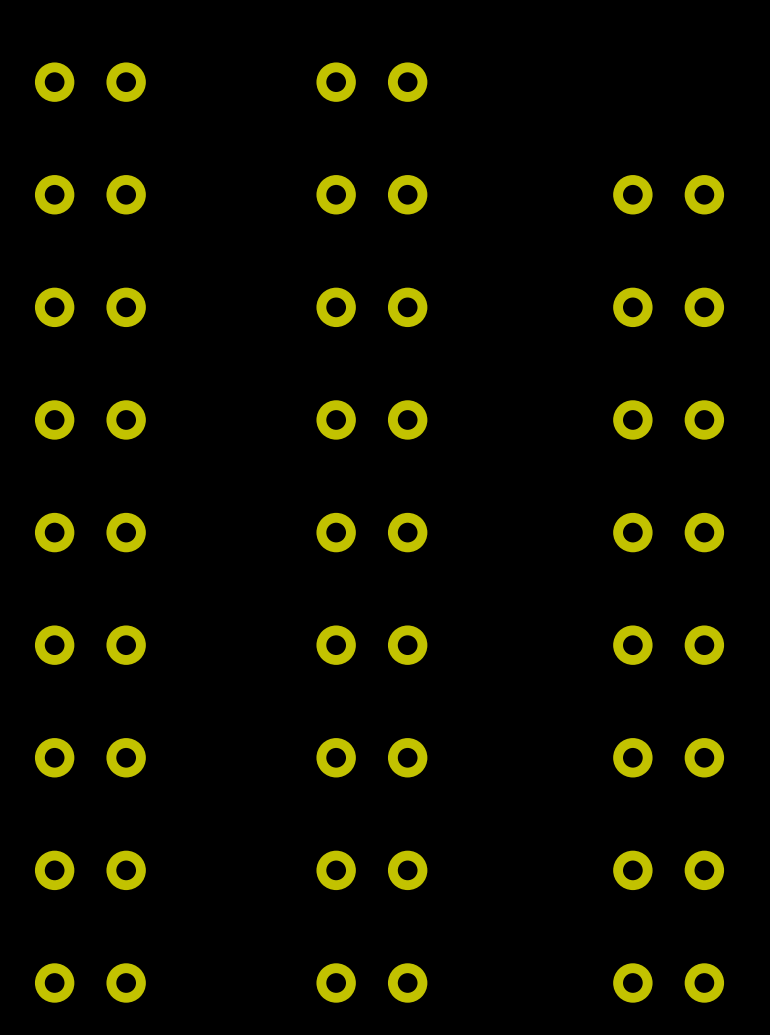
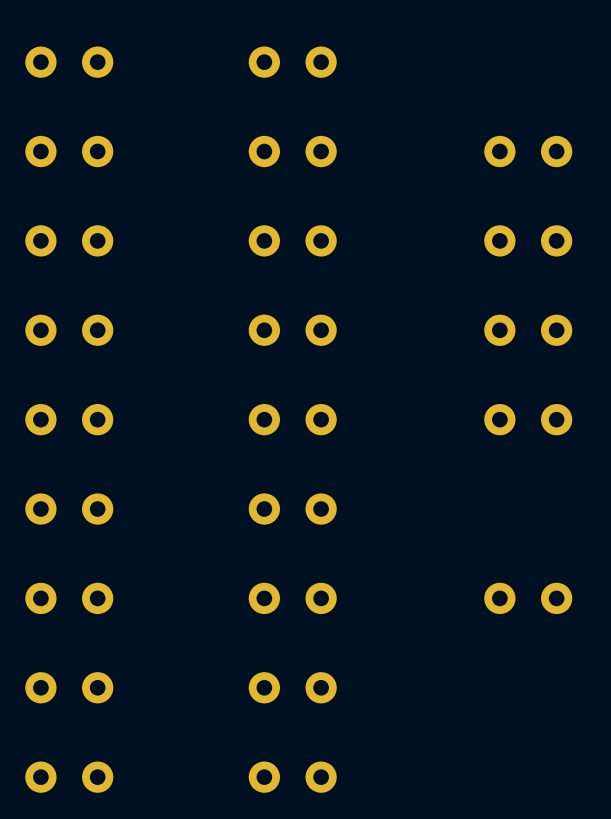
part: (668, 645) -> none
part: (668, 870) -> none
part: (668, 982) -> none

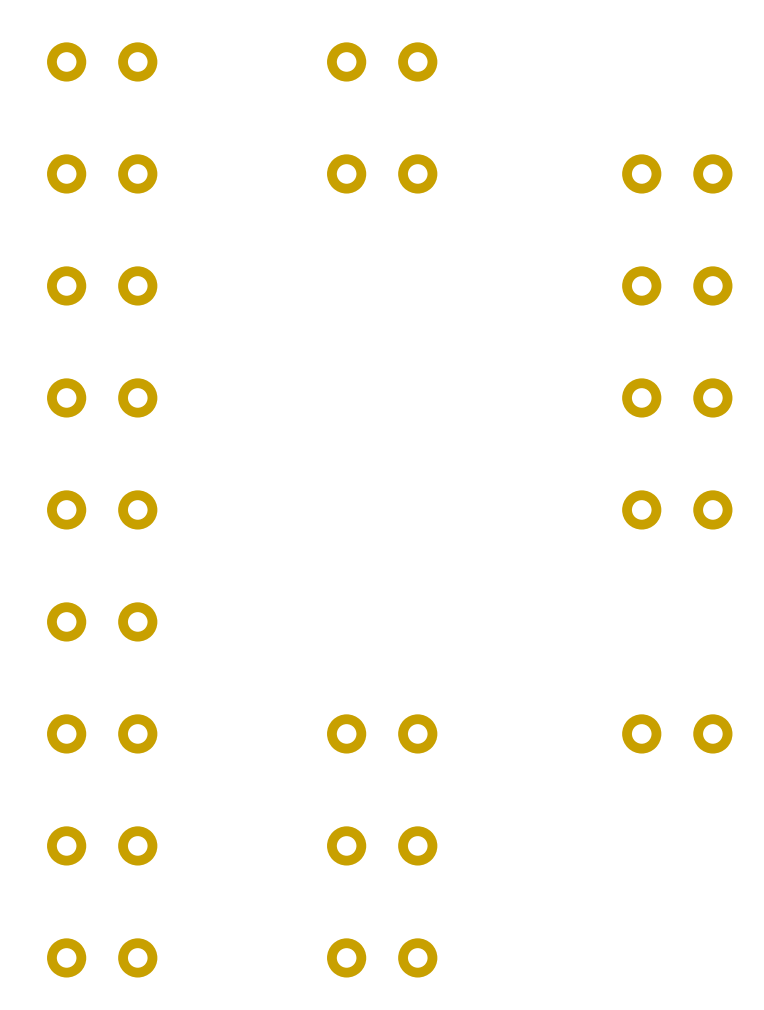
part: (292, 240) -> none
part: (292, 330) -> none
part: (292, 419) -> none
part: (292, 509) -> none

